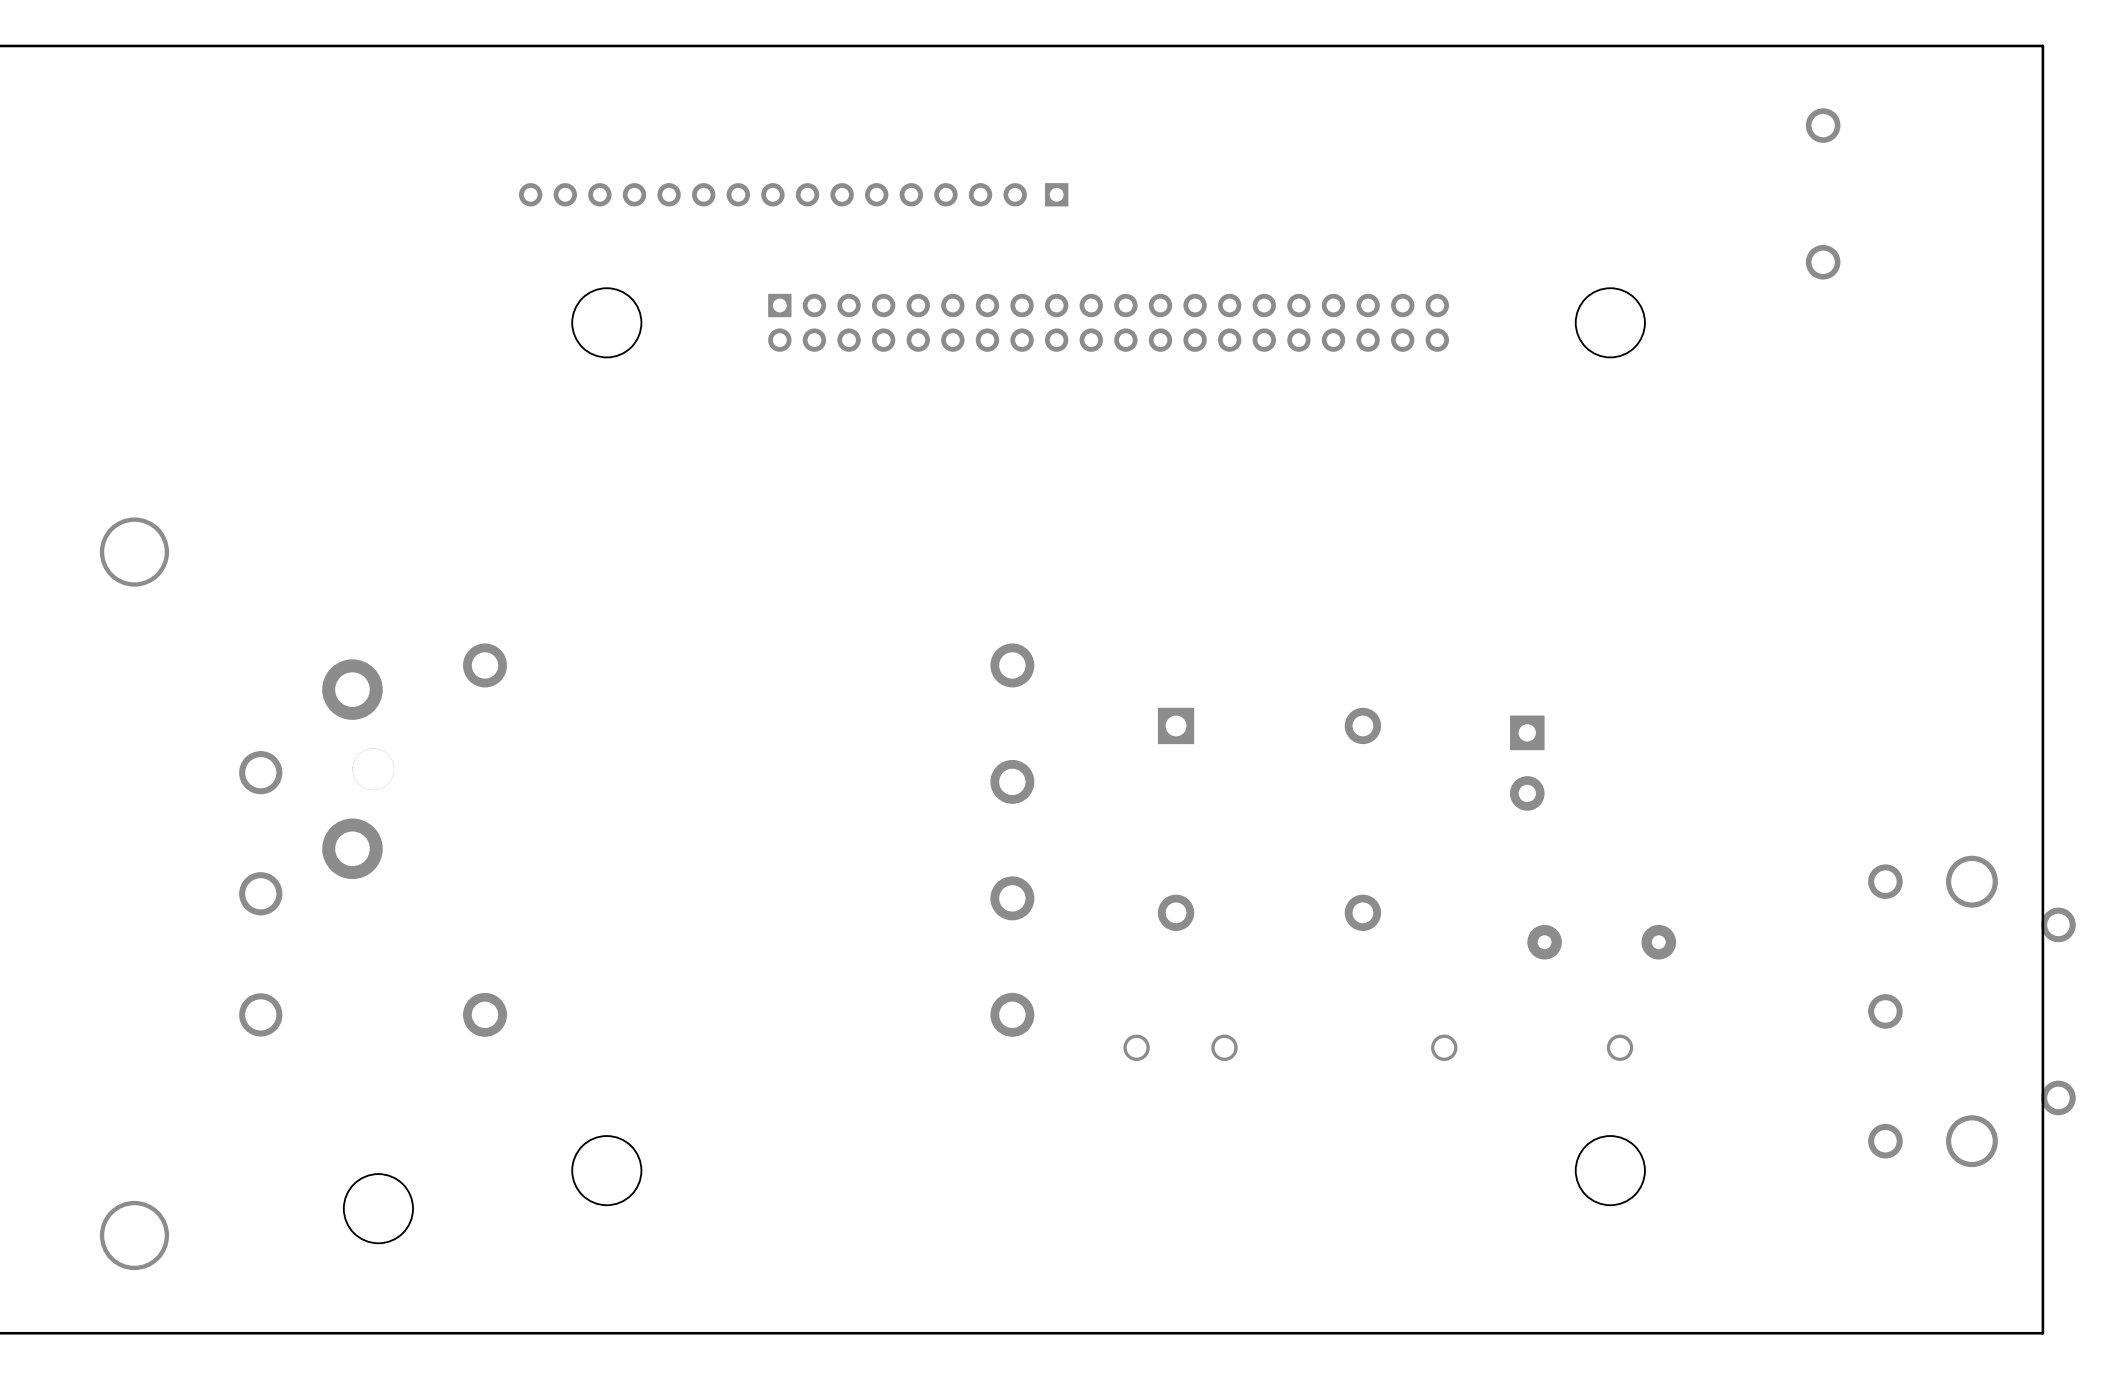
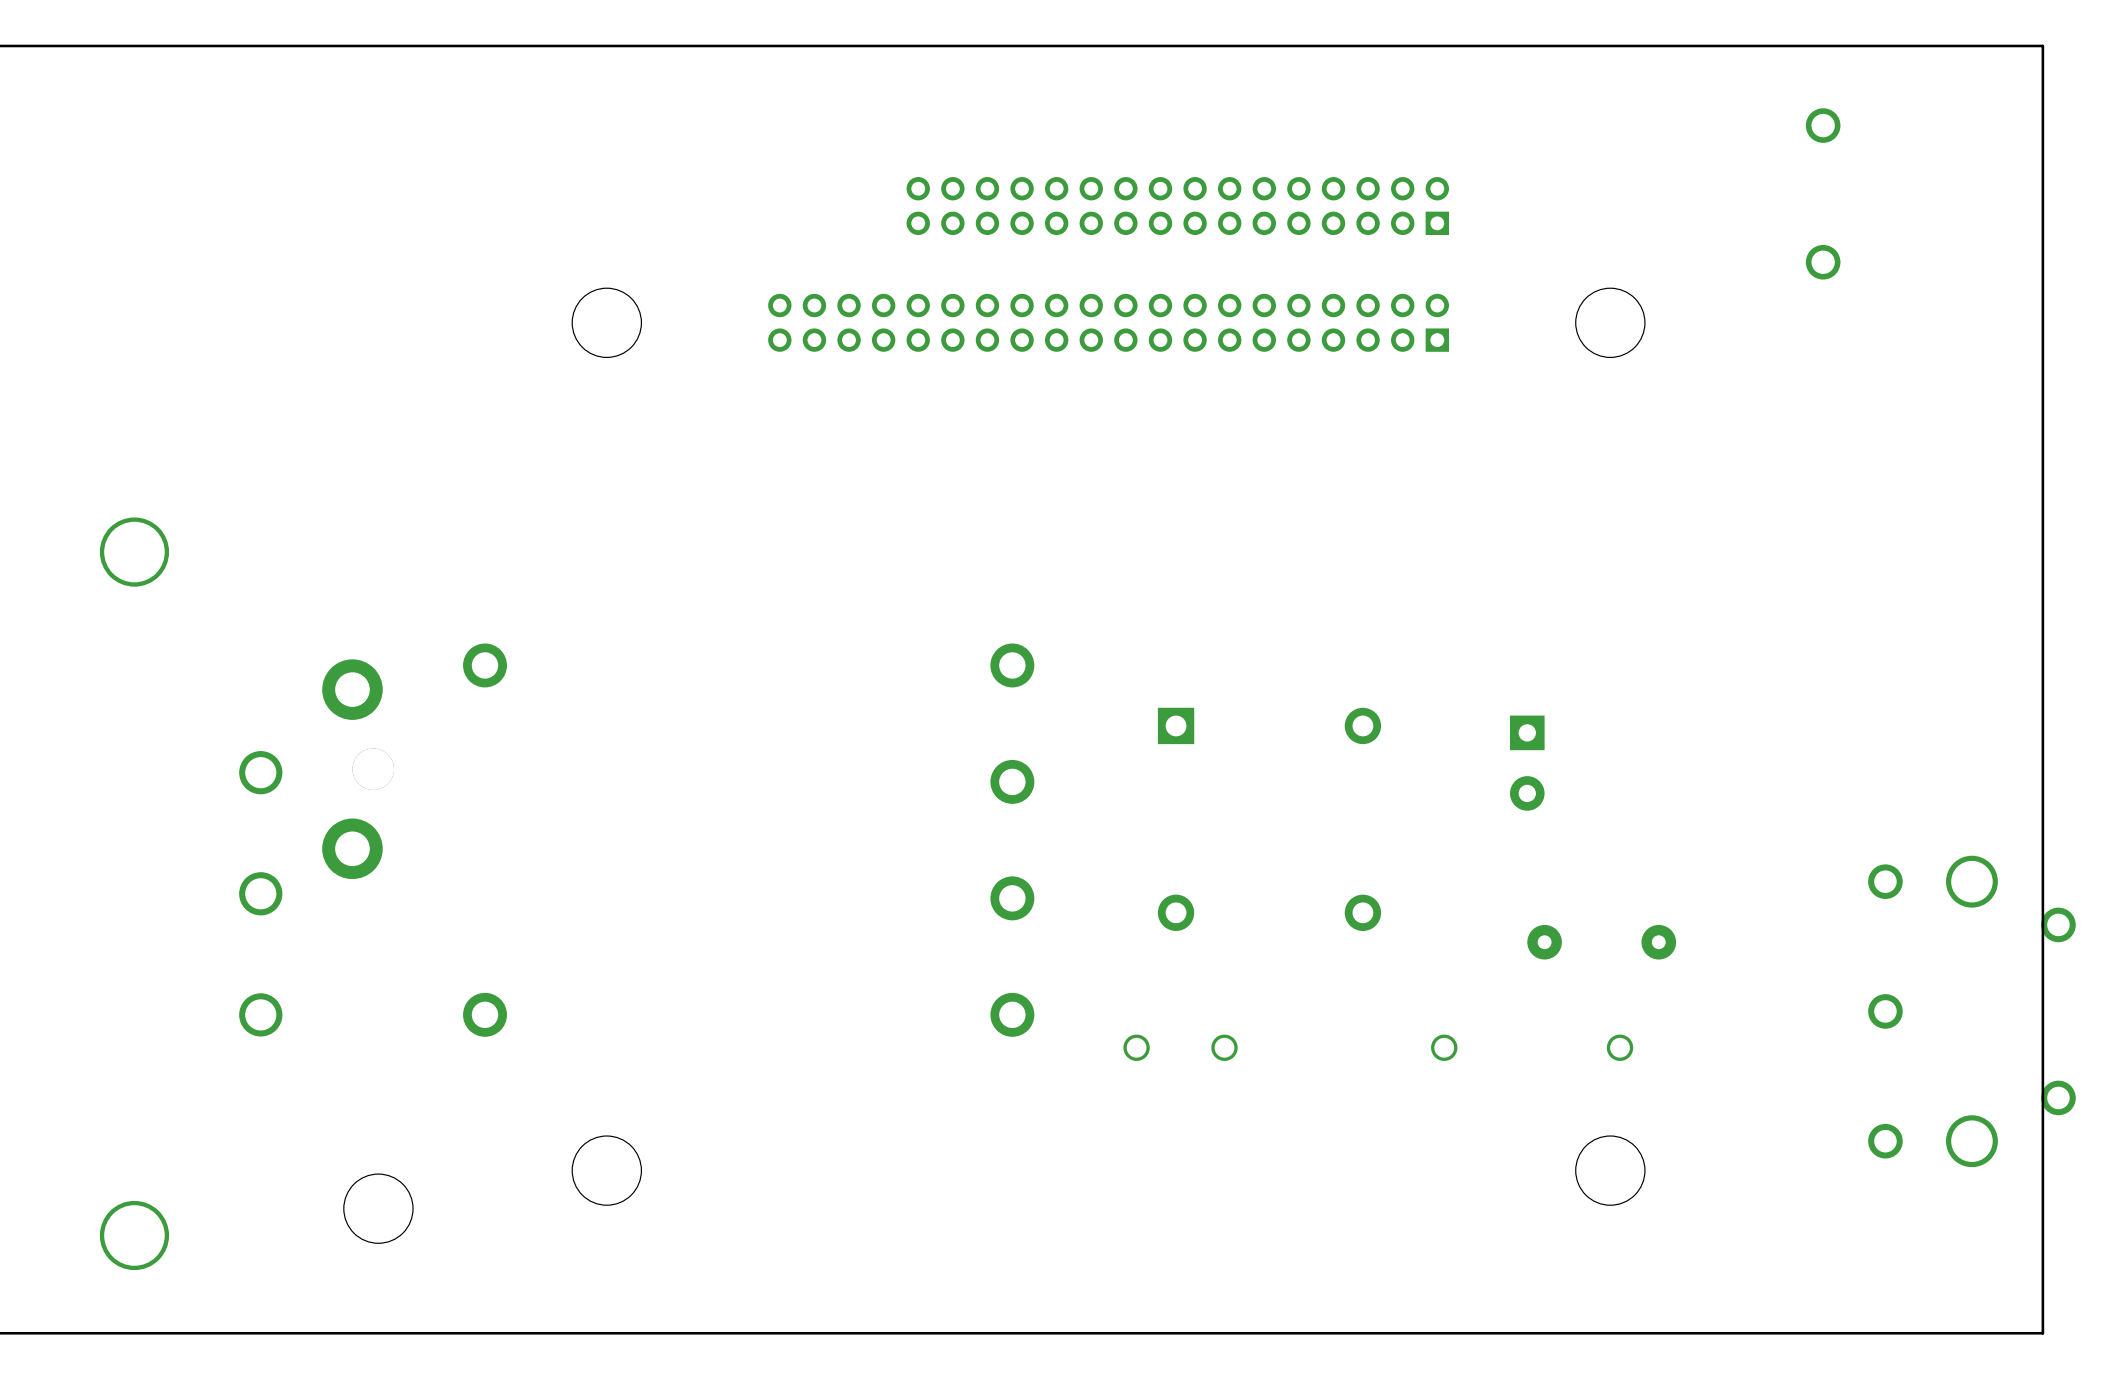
part: (793, 194) -> none
part: none -> (1177, 206)
part rotation: 0° (1108, 322) -> 180° (1108, 322)

